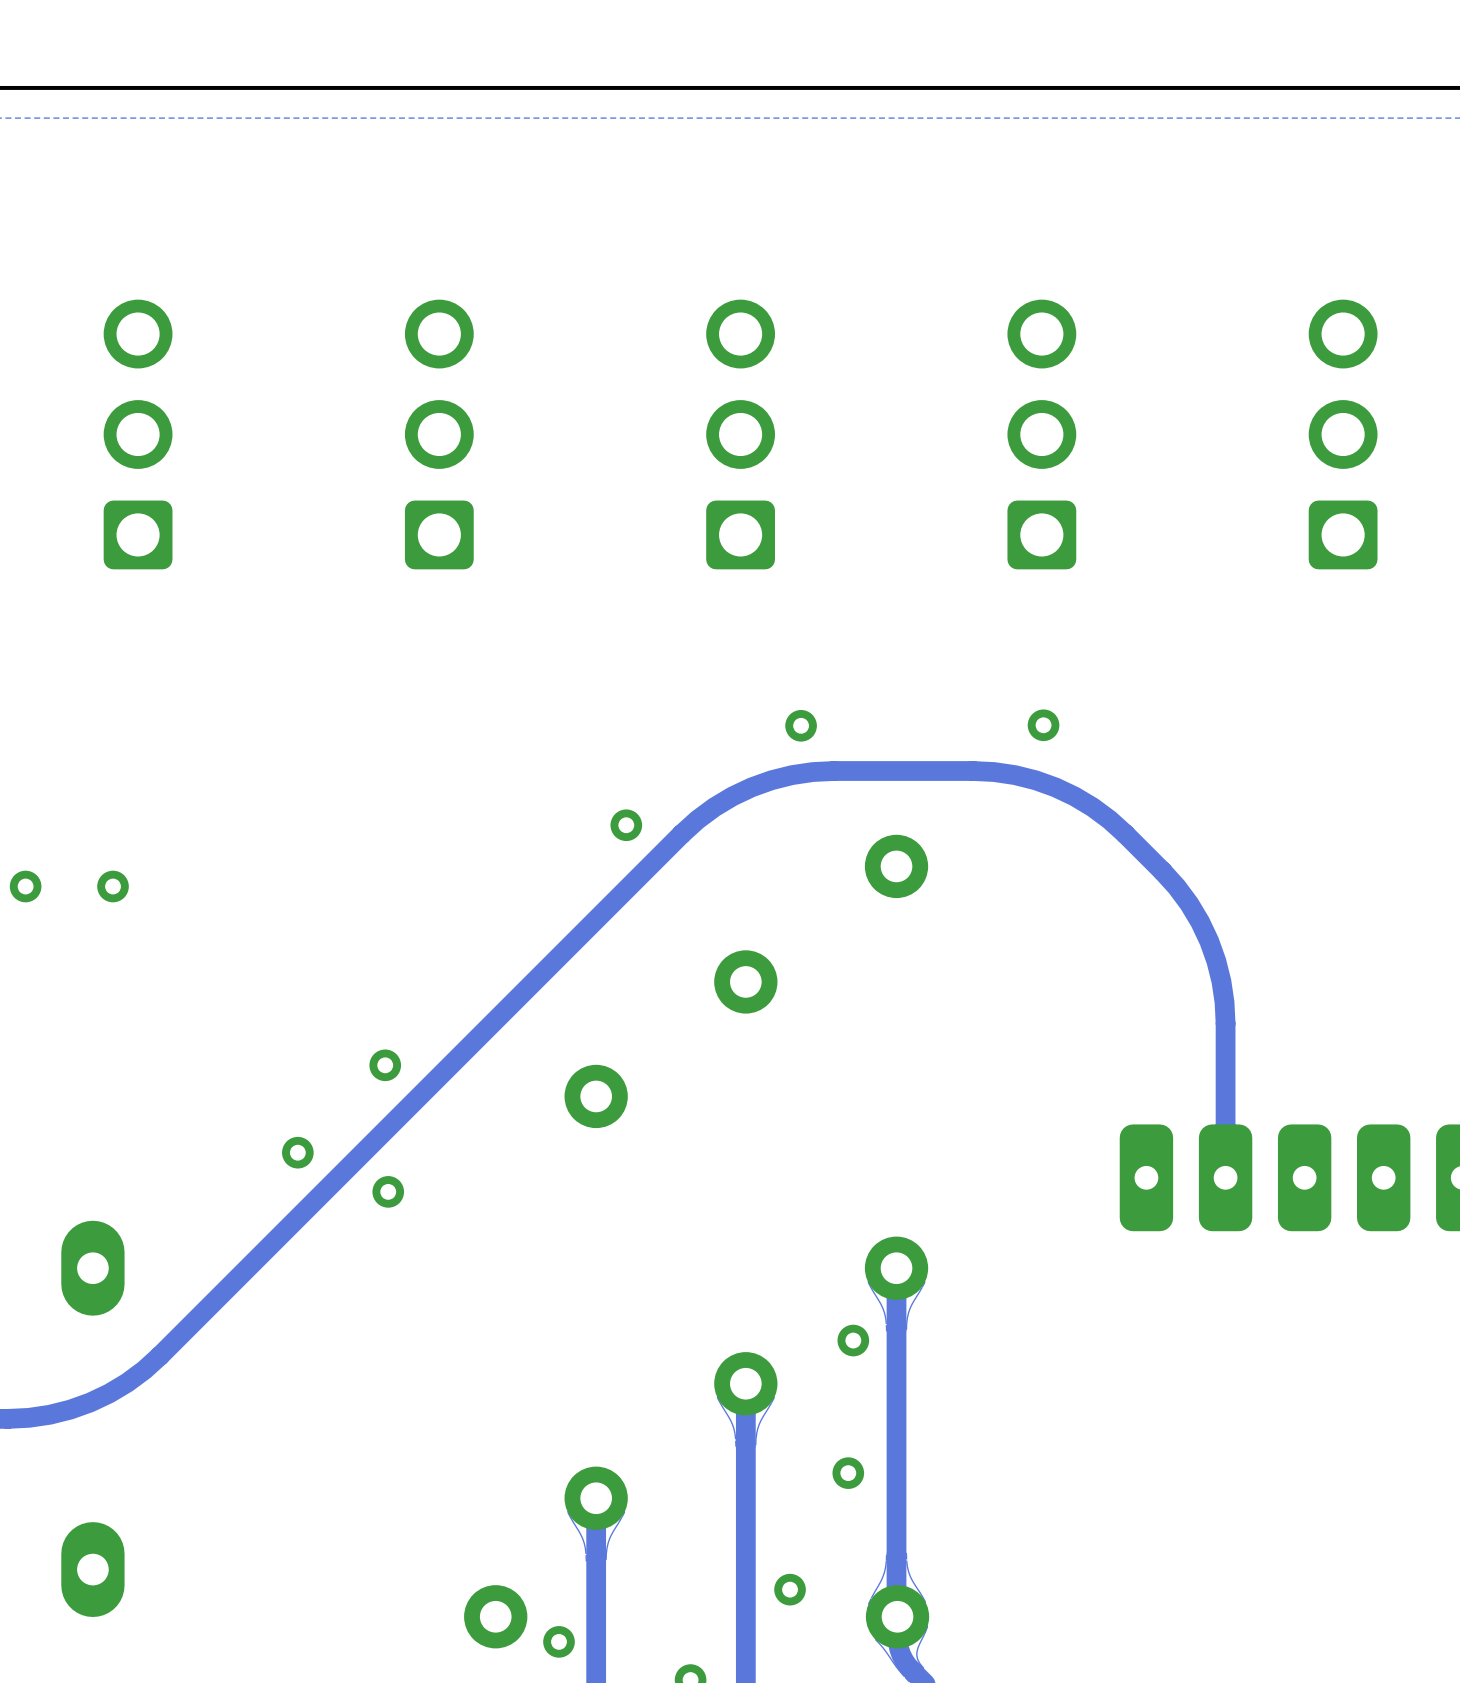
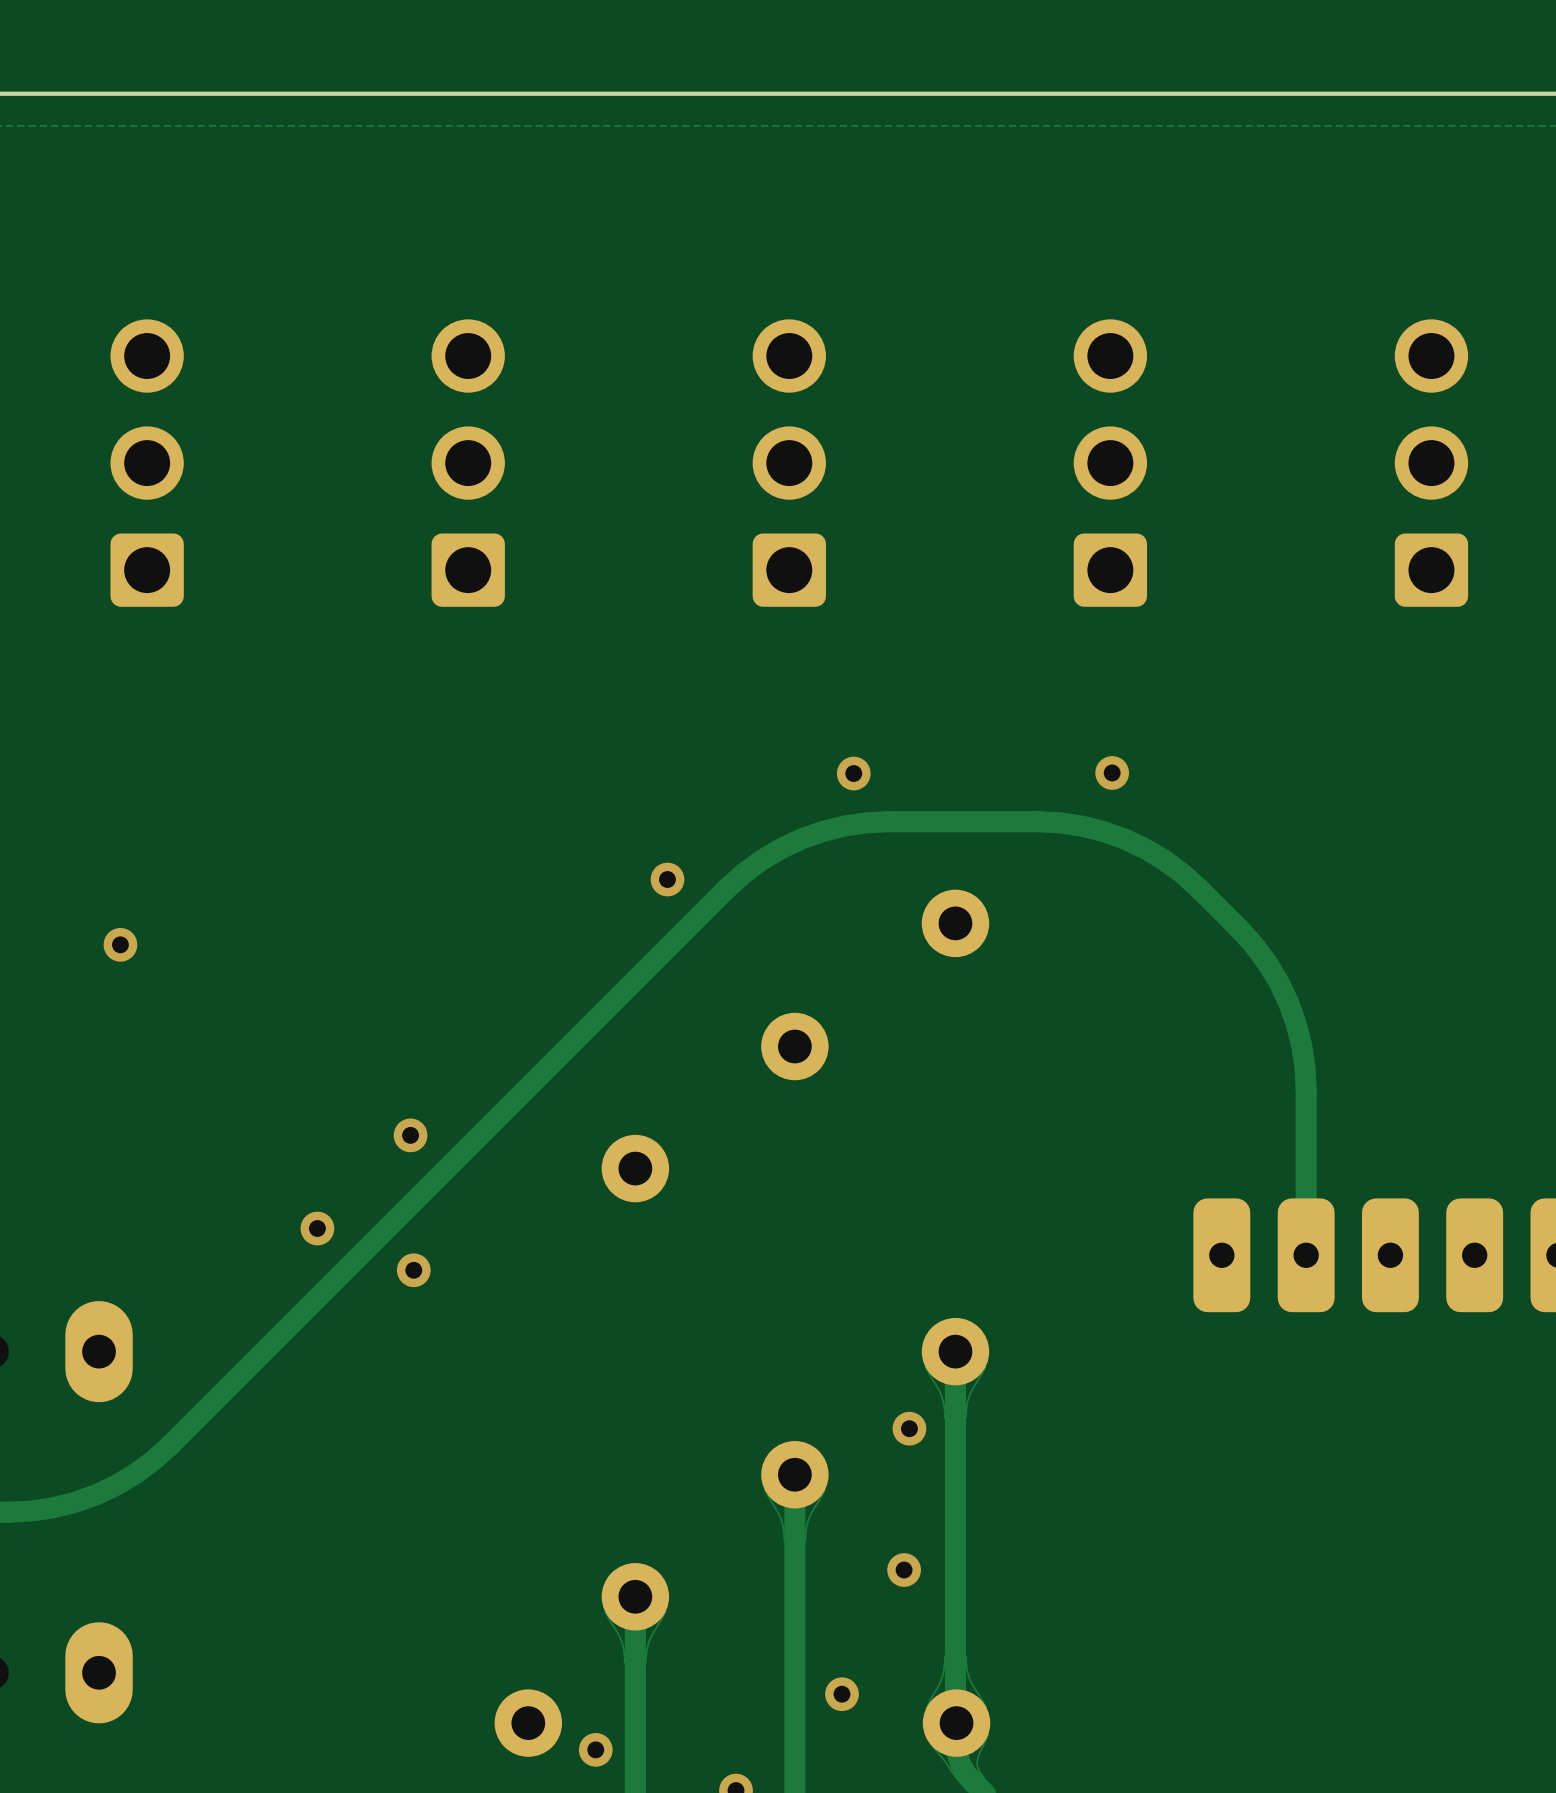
via: (25, 886) -> none

